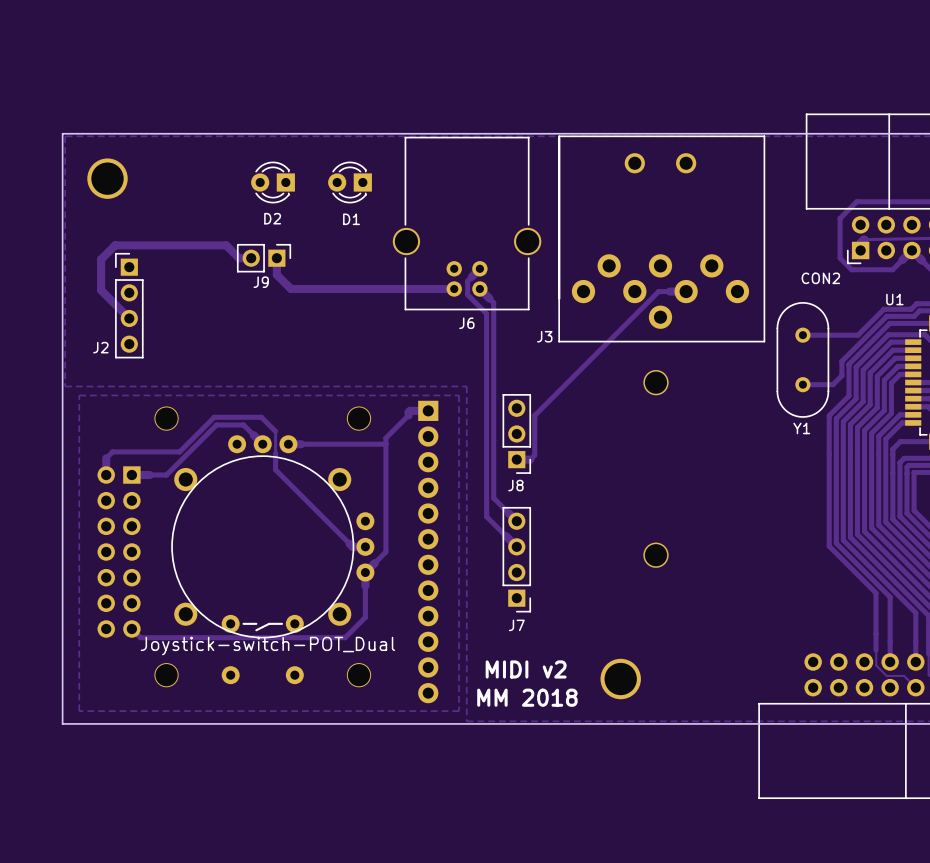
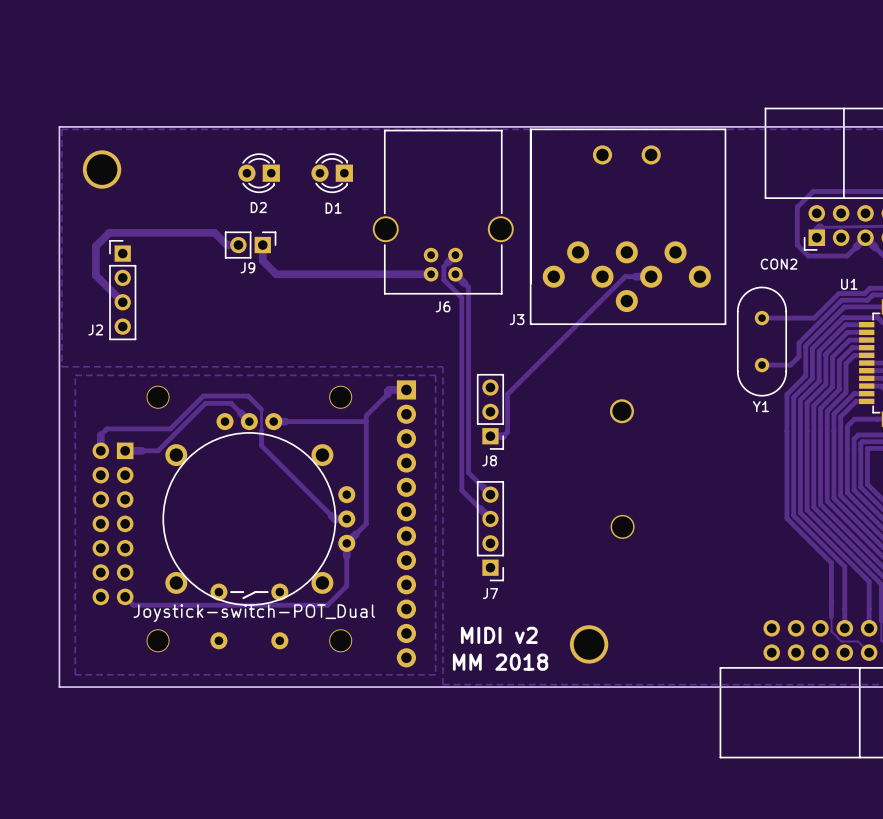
part: (656, 382) -> none
part: none -> (621, 411)

